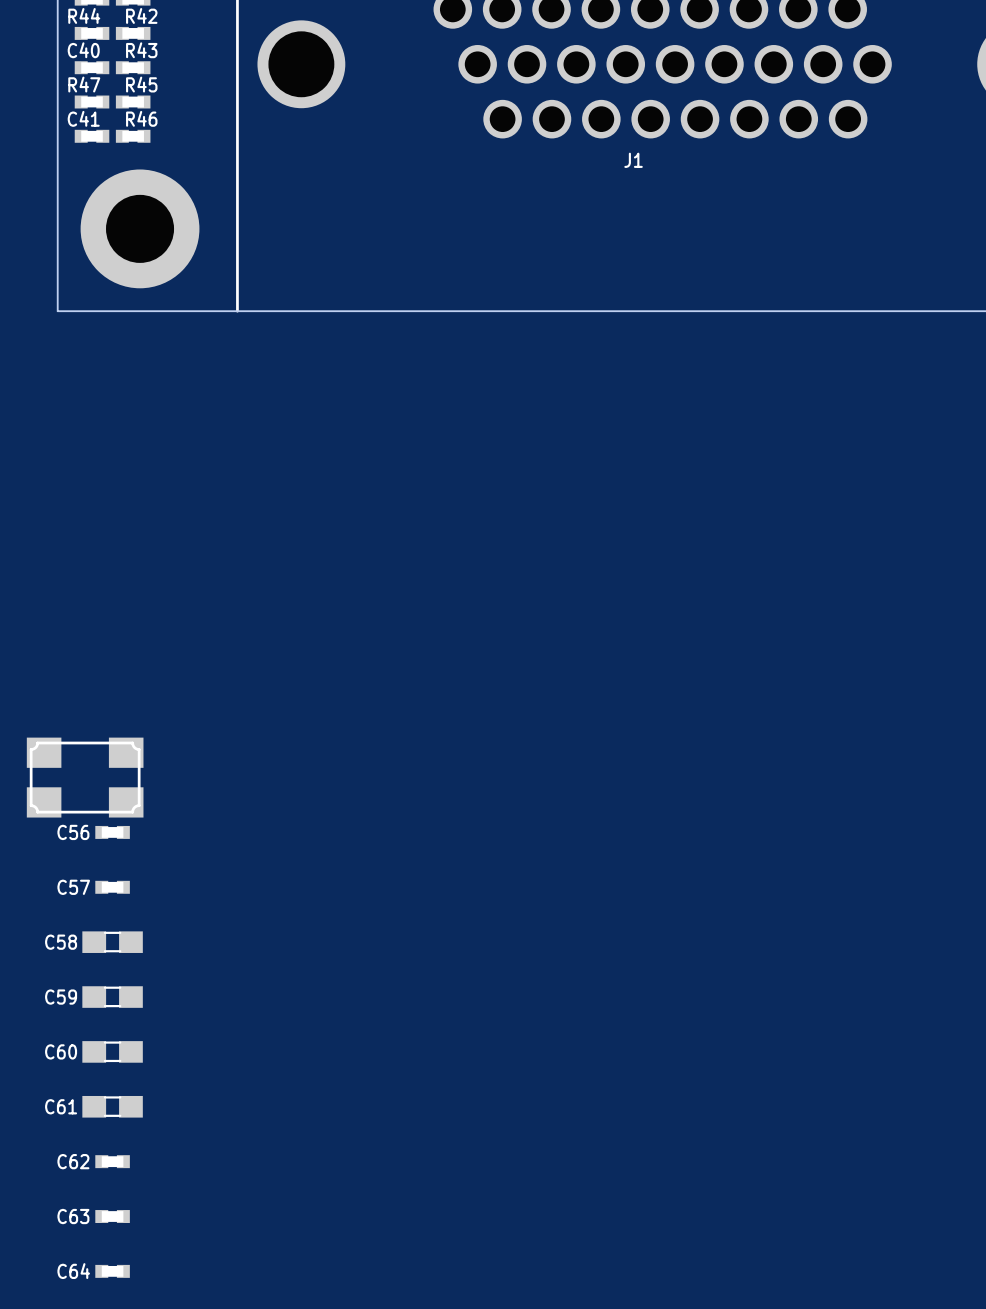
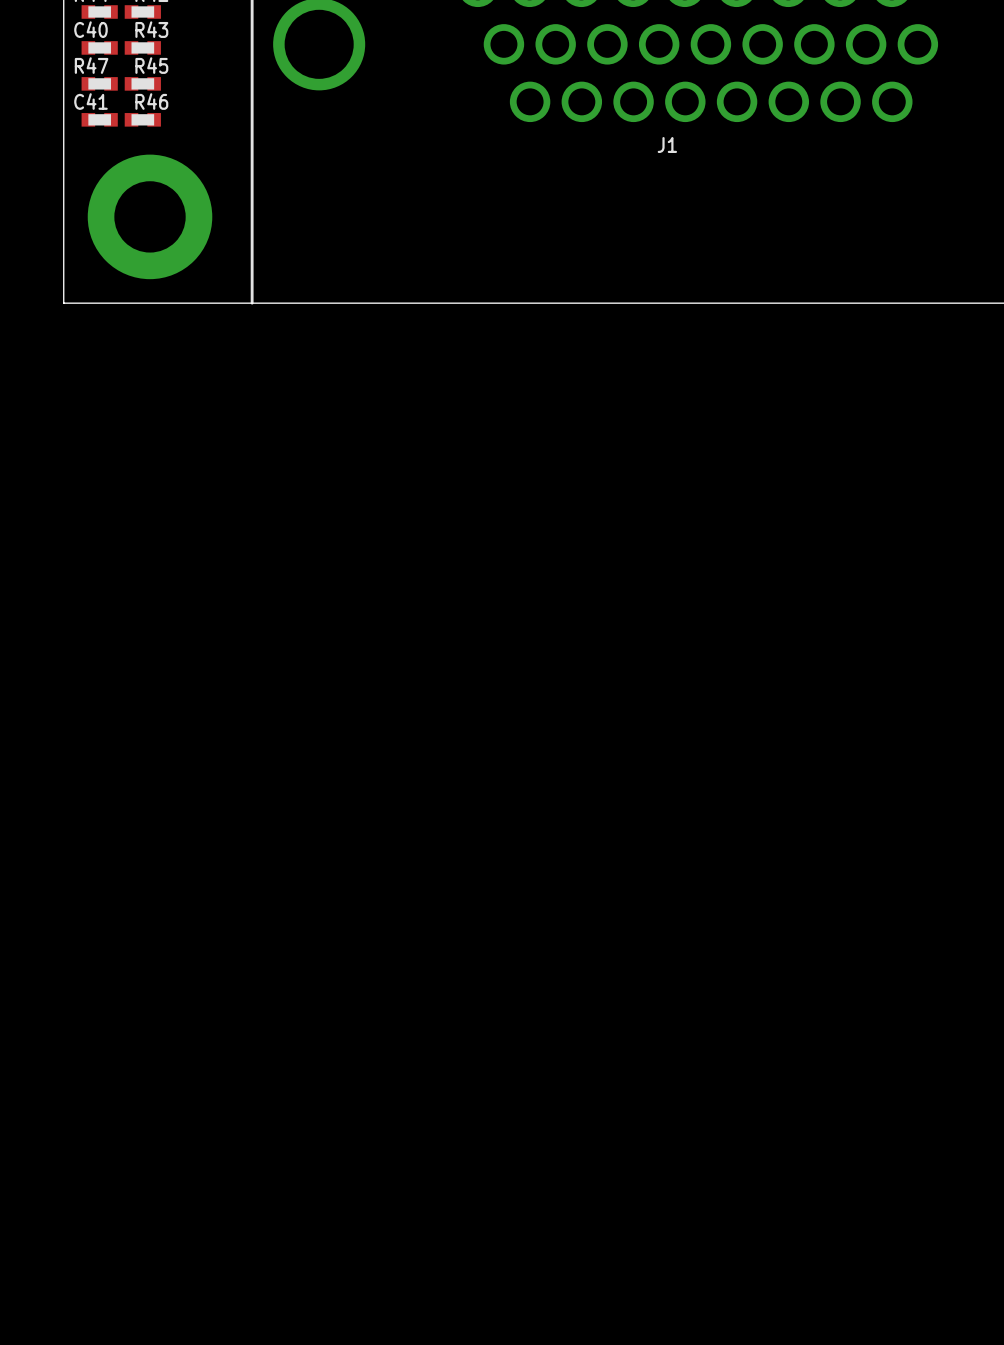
part: (85, 777) -> none
C56: (112, 832) -> none
C57: (112, 887) -> none
C58: (112, 942) -> none
C59: (112, 997) -> none
C60: (112, 1051) -> none
C61: (112, 1106) -> none
C62: (112, 1161) -> none
C63: (112, 1216) -> none
C64: (112, 1271) -> none

